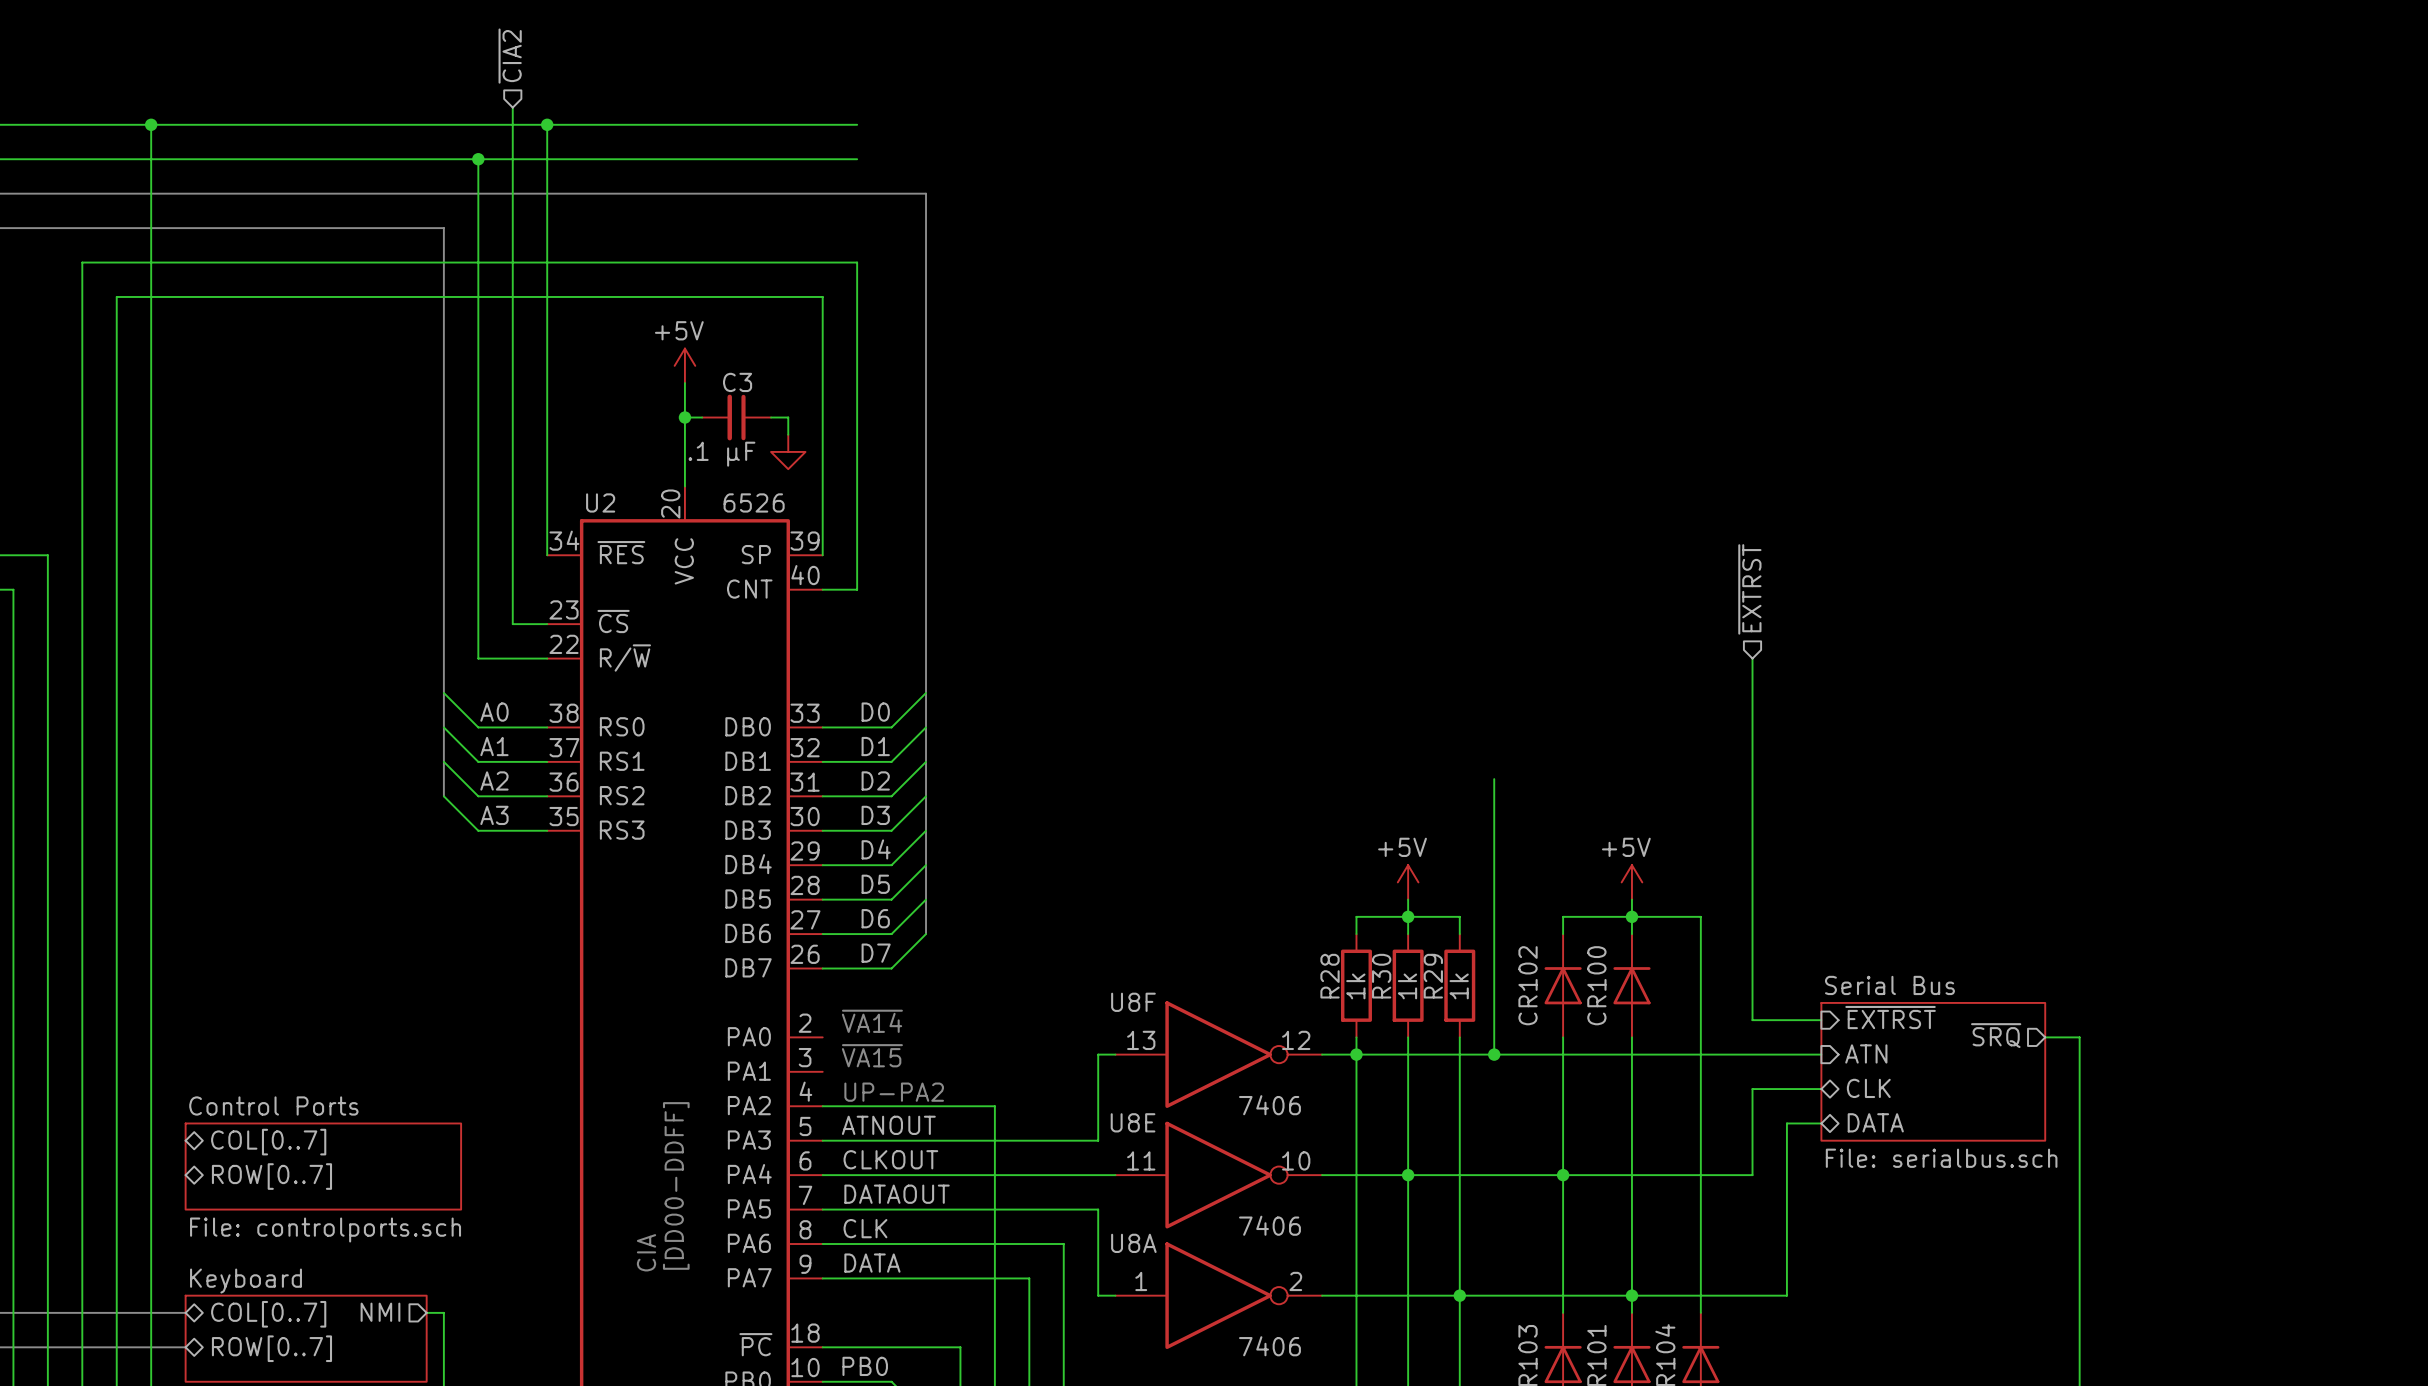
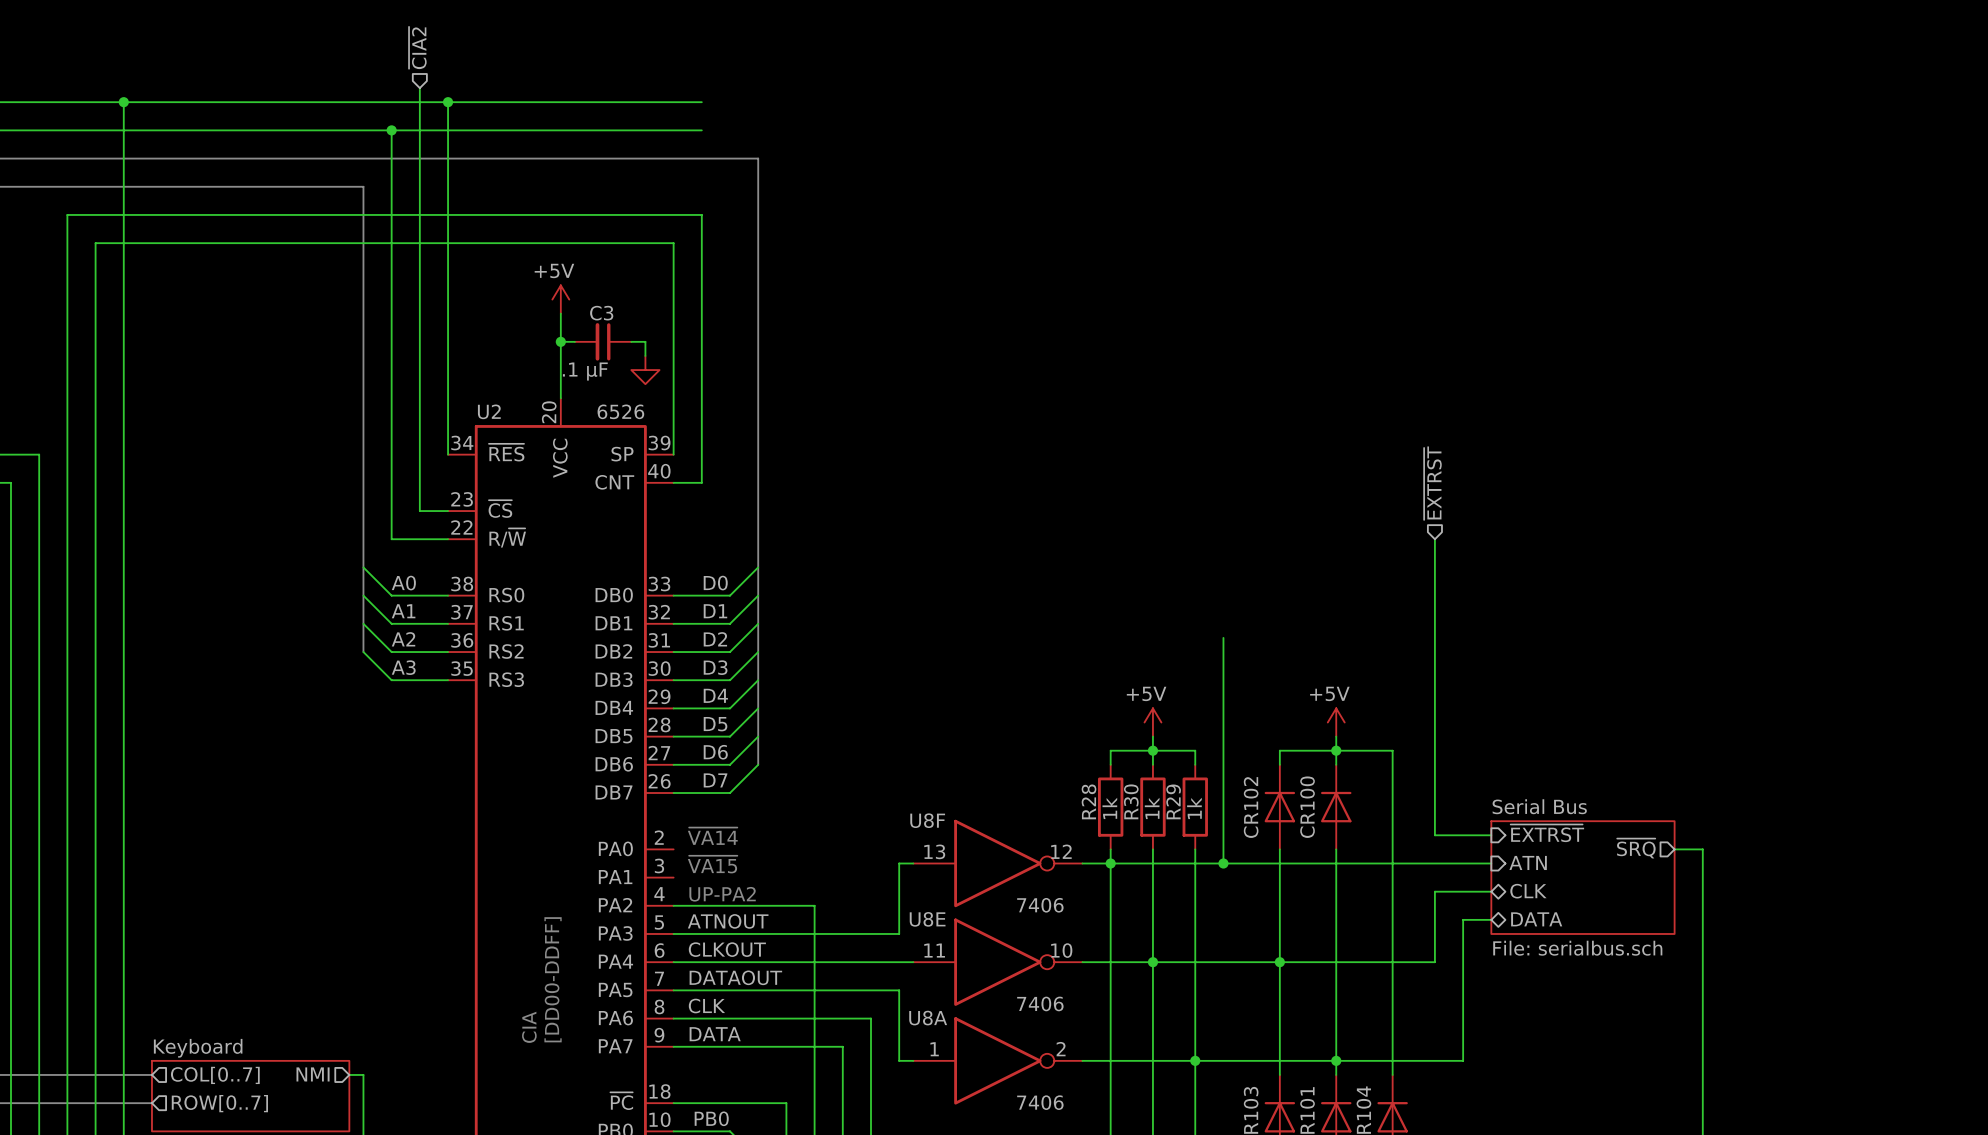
sheet pin: COL[0..7] (268, 1142) -> none
sheet Control Ports: File: controlports.sch (323, 1166) -> none
sheet pin: ROW[0..7] (271, 1176) -> none
sheet pin shape: bidirectional (268, 1314) -> output (215, 1075)
sheet pin shape: bidirectional (271, 1348) -> output (219, 1103)

